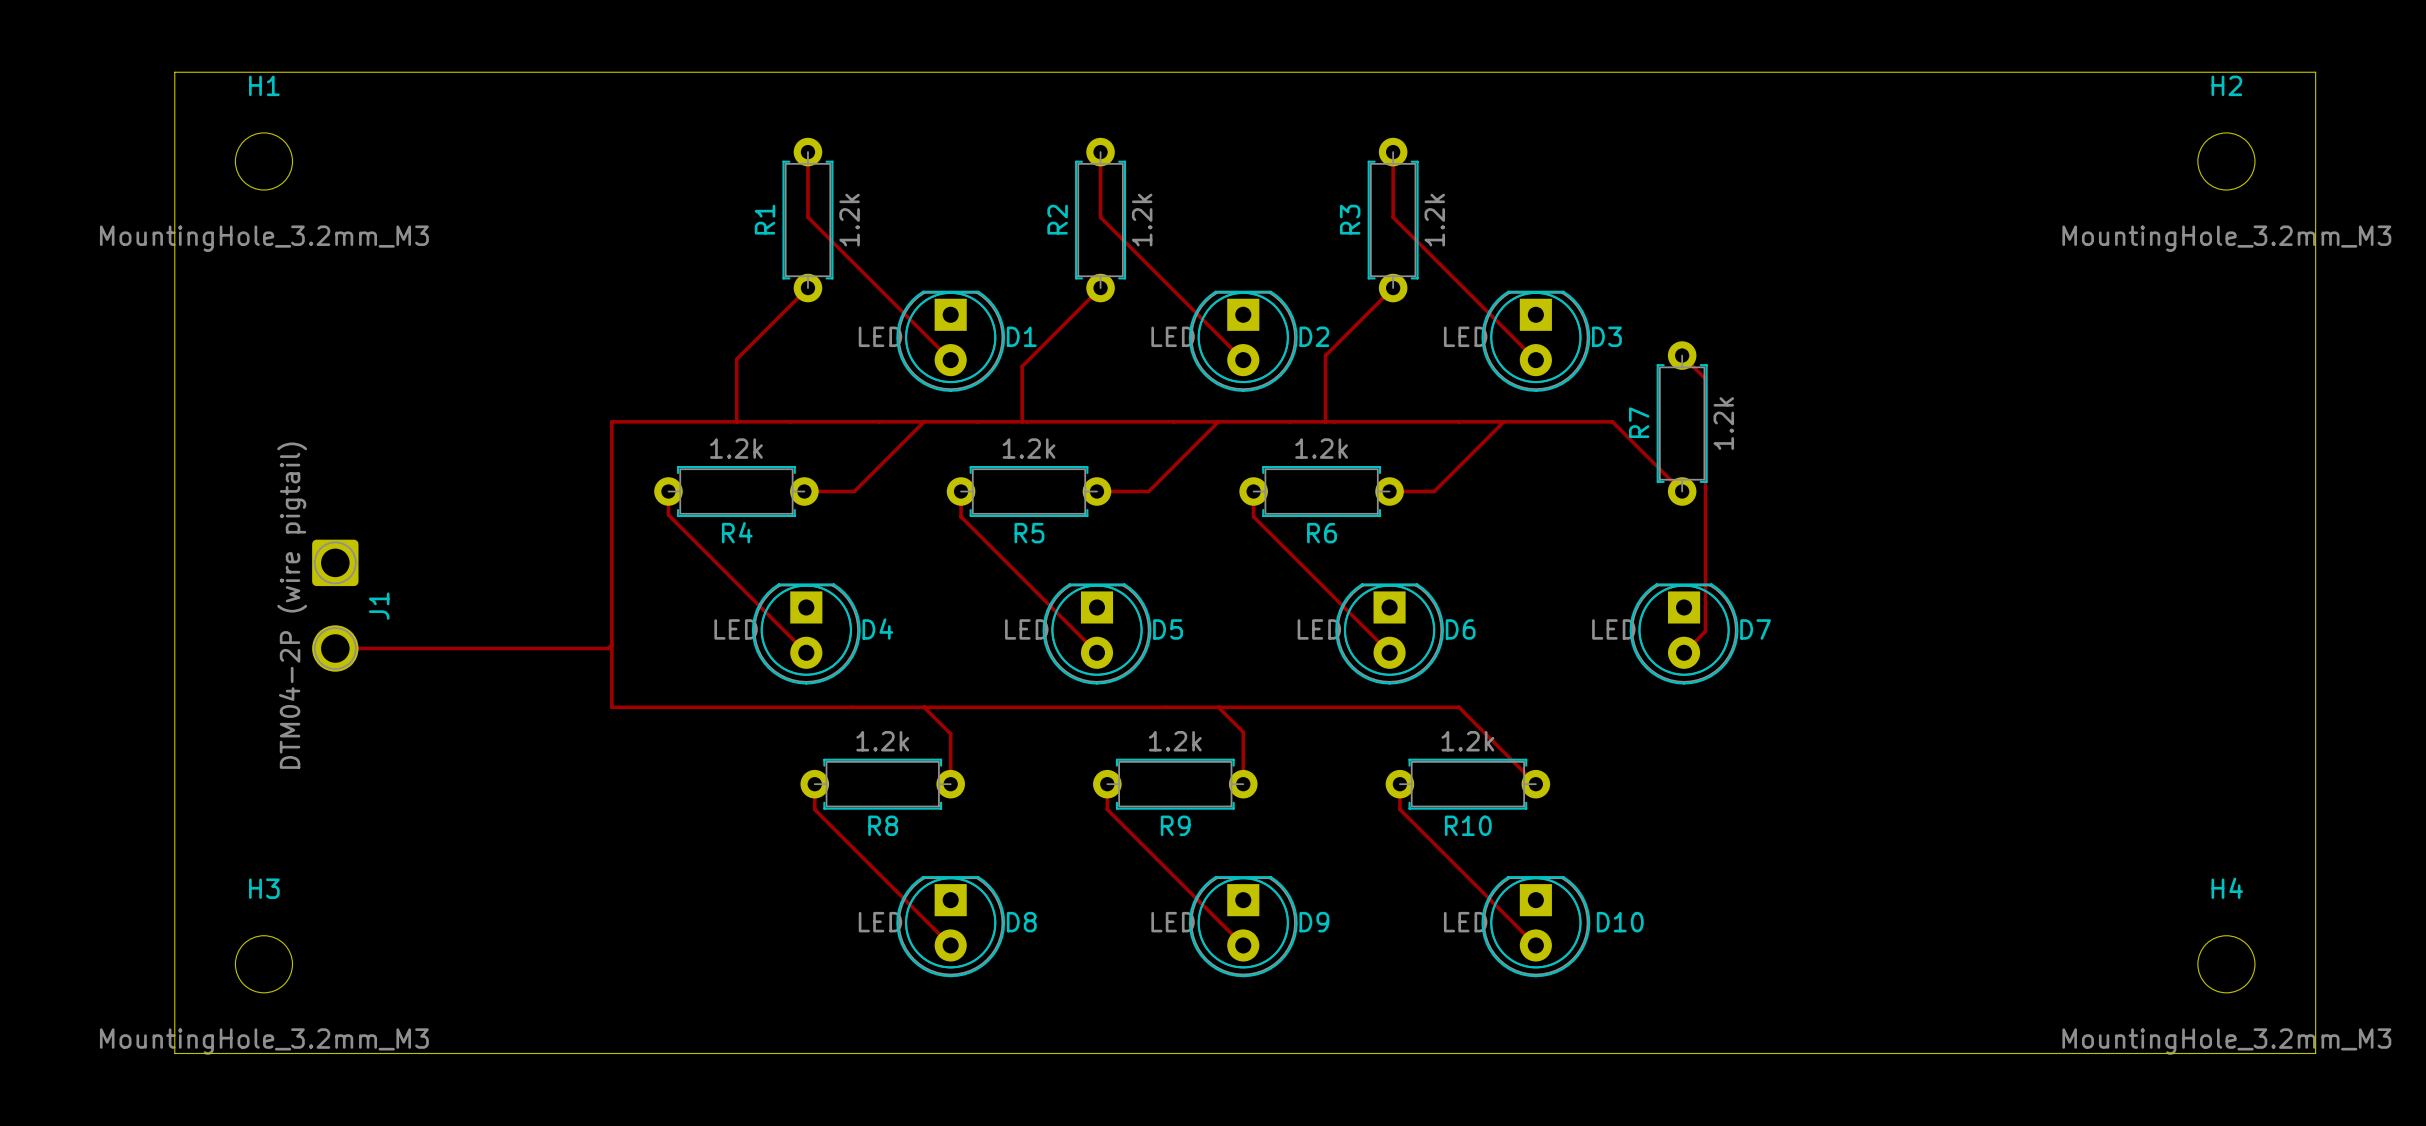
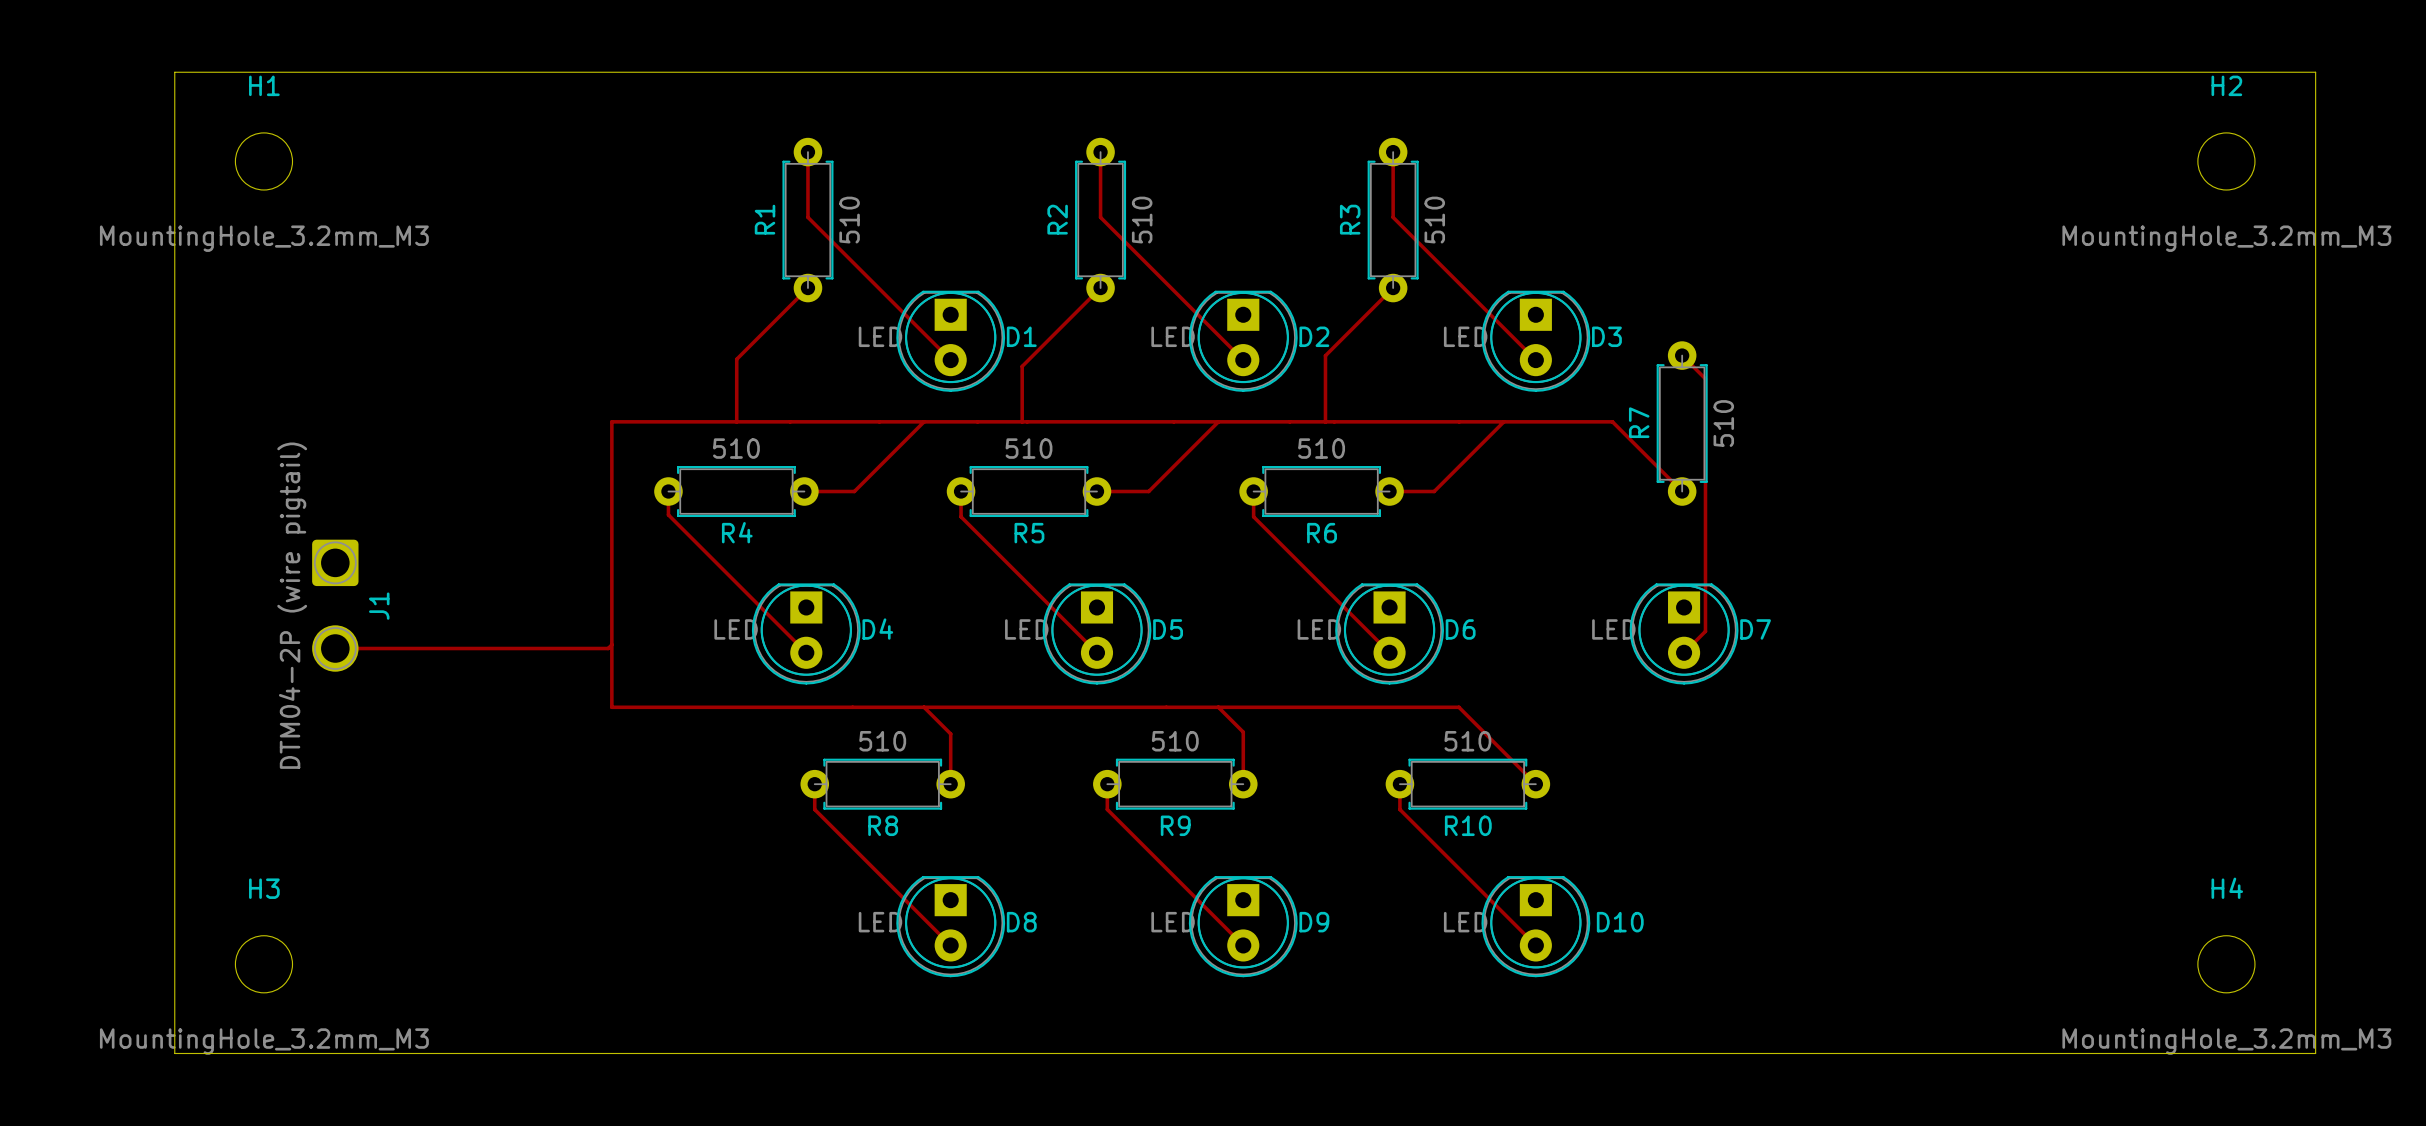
R1 value: 1.2k (849, 220) -> 510 (849, 220)
R2 value: 1.2k (1142, 220) -> 510 (1142, 220)
R3 value: 1.2k (1434, 220) -> 510 (1434, 220)
R7 value: 1.2k (1723, 423) -> 510 (1723, 423)
R4 value: 1.2k (736, 448) -> 510 (736, 448)
R5 value: 1.2k (1029, 448) -> 510 (1029, 448)
R6 value: 1.2k (1321, 448) -> 510 (1321, 448)
R8 value: 1.2k (882, 741) -> 510 (882, 741)
R9 value: 1.2k (1175, 741) -> 510 (1175, 741)
R10 value: 1.2k (1467, 741) -> 510 (1467, 741)

